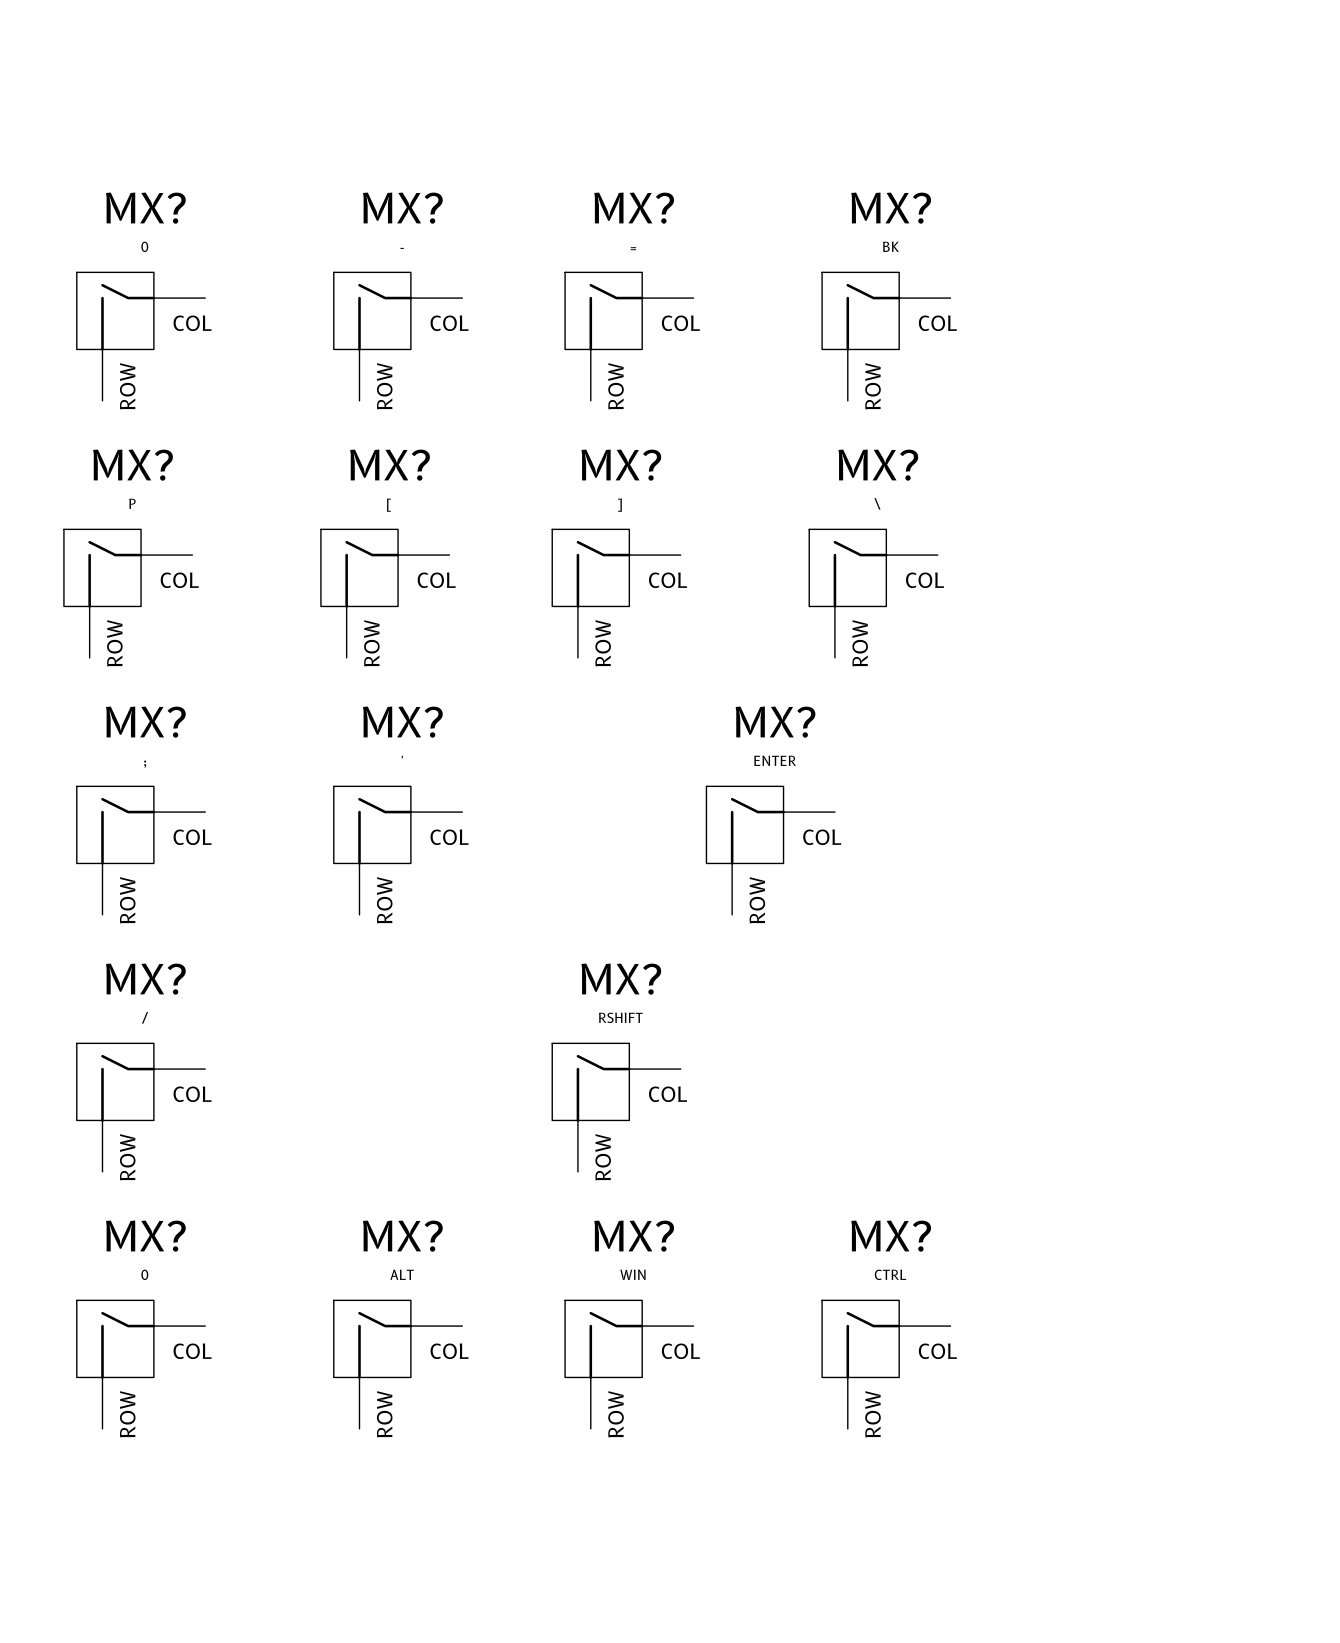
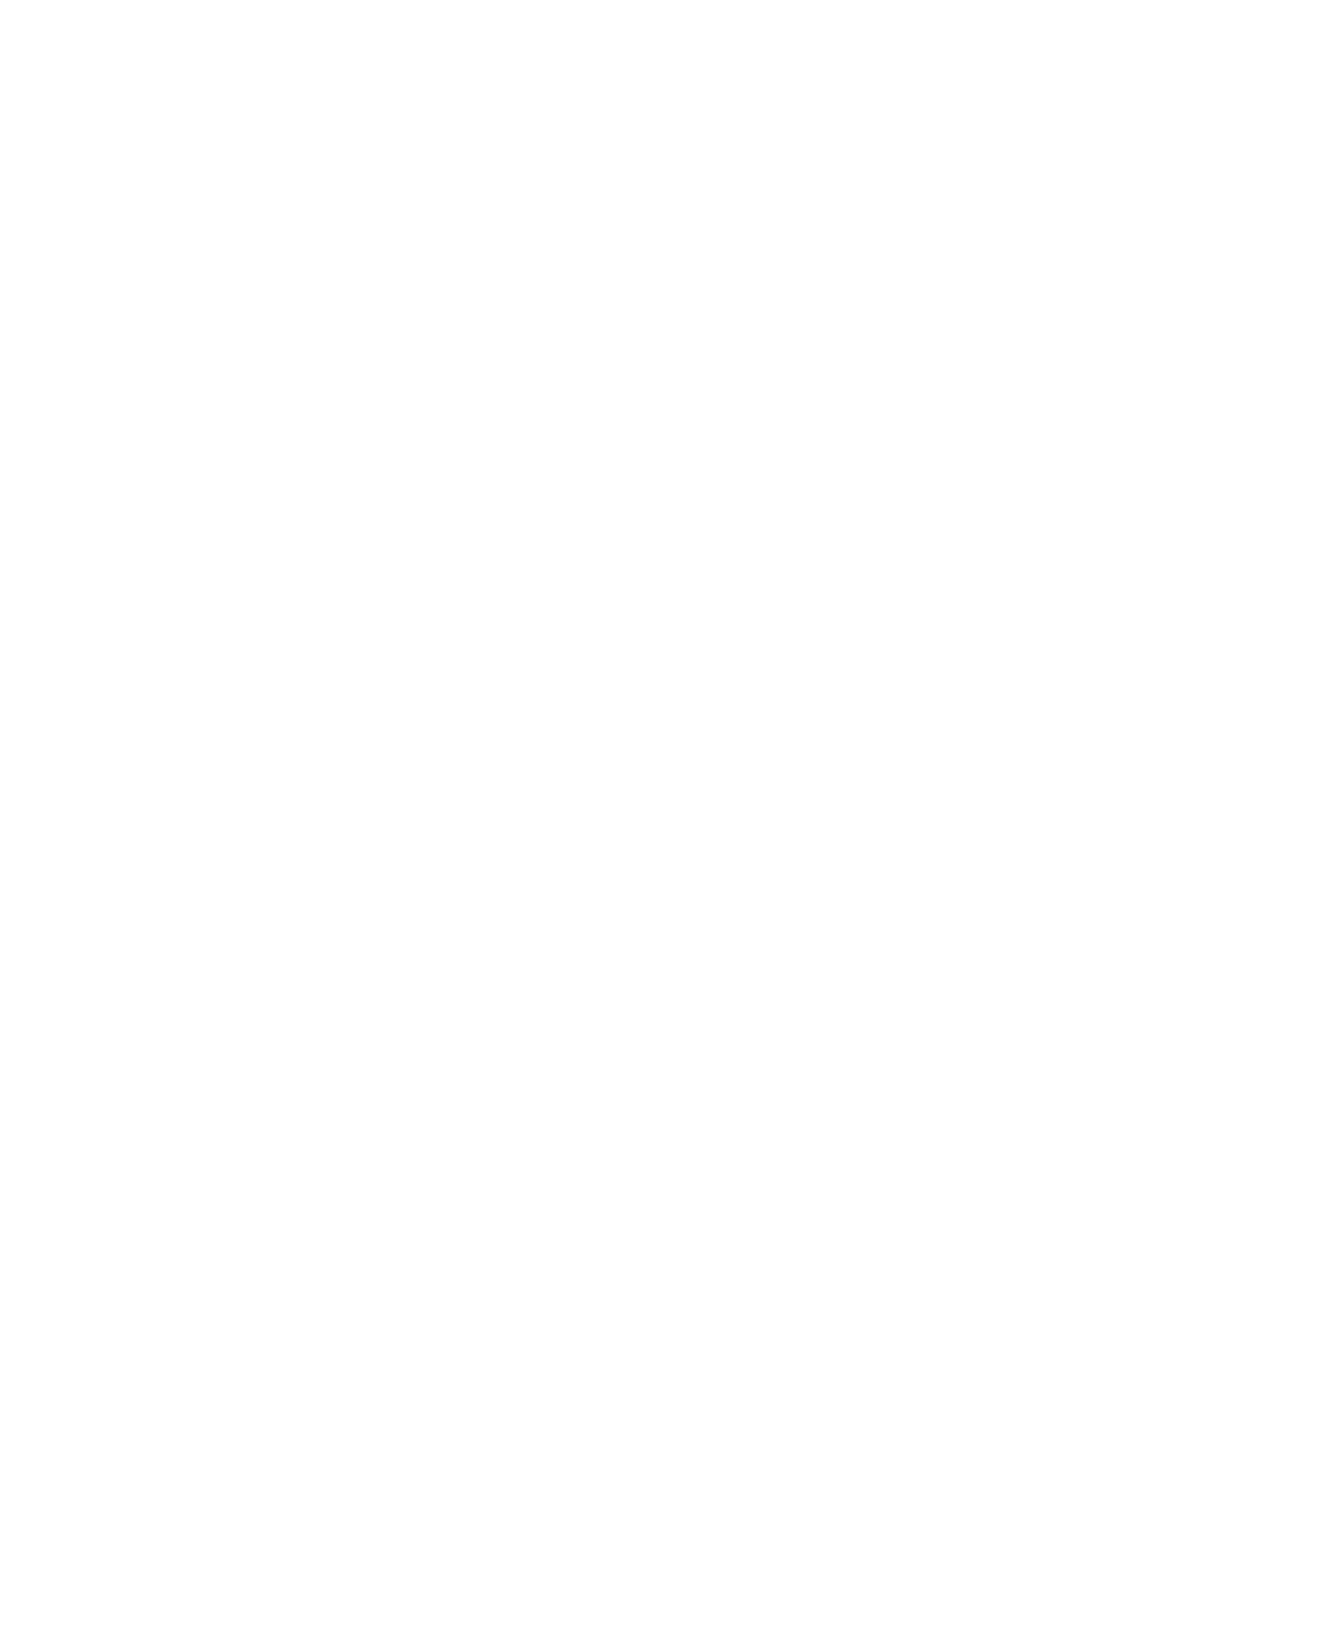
MX?: 0 (141, 336) -> none
MX?: - (398, 336) -> none
MX?: = (629, 336) -> none
MX?: BK (886, 336) -> none
MX?: P (128, 593) -> none
MX?: [ (385, 593) -> none
MX?: ] (616, 593) -> none
MX?: \ (873, 593) -> none
MX?: ; (141, 850) -> none
MX?: ' (398, 850) -> none
MX?: ENTER (770, 850) -> none
MX?: / (141, 1107) -> none
MX?: RSHIFT (616, 1107) -> none
MX?: 0 (141, 1364) -> none
MX?: ALT (398, 1364) -> none
MX?: WIN (629, 1364) -> none
MX?: CTRL (886, 1364) -> none

